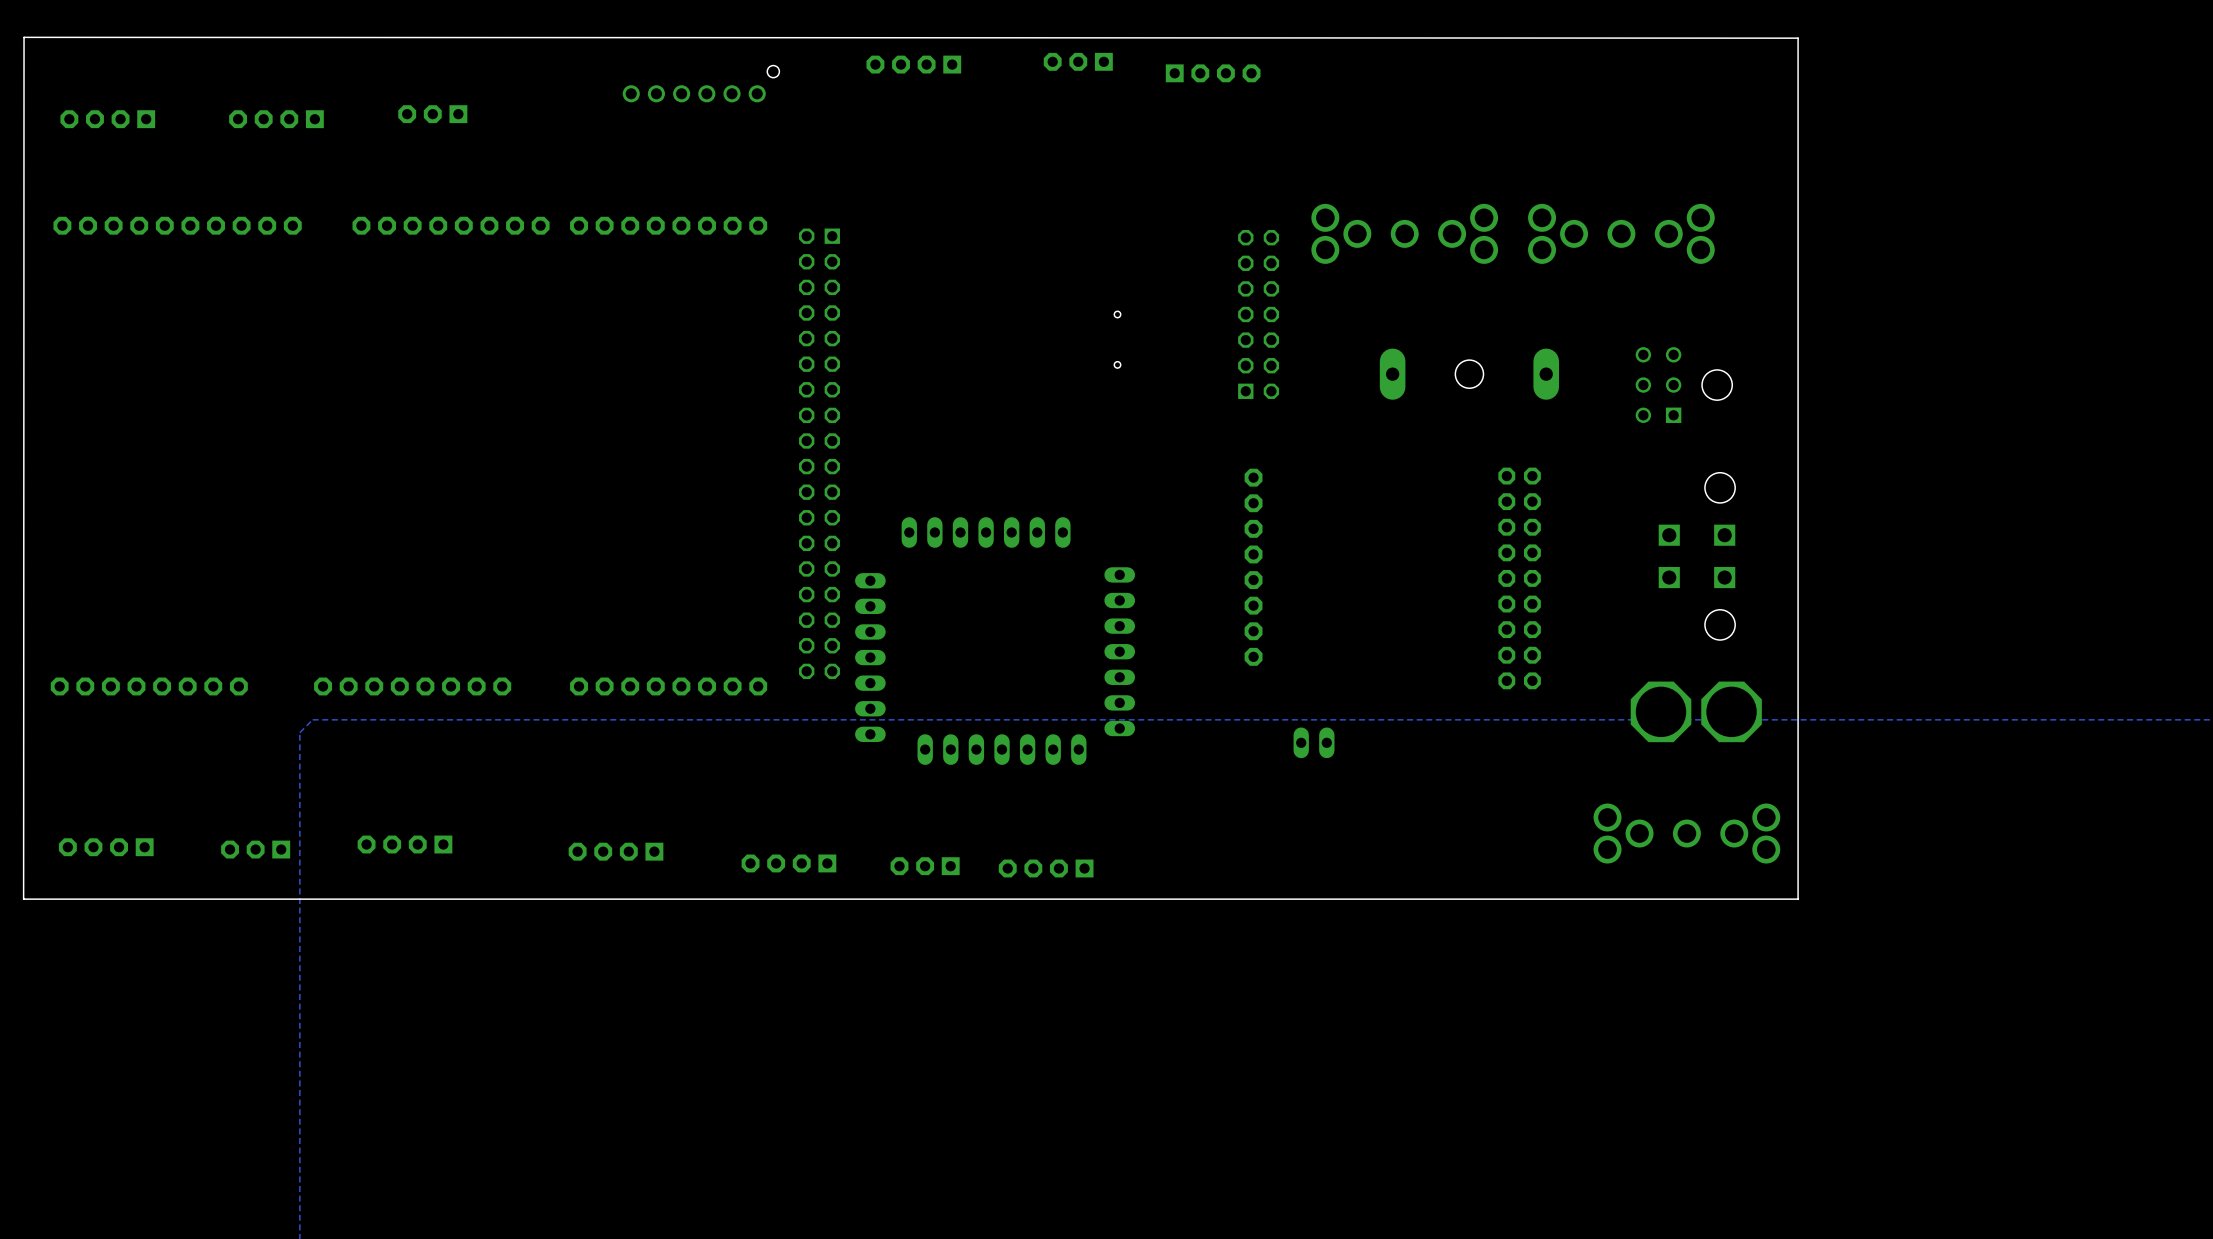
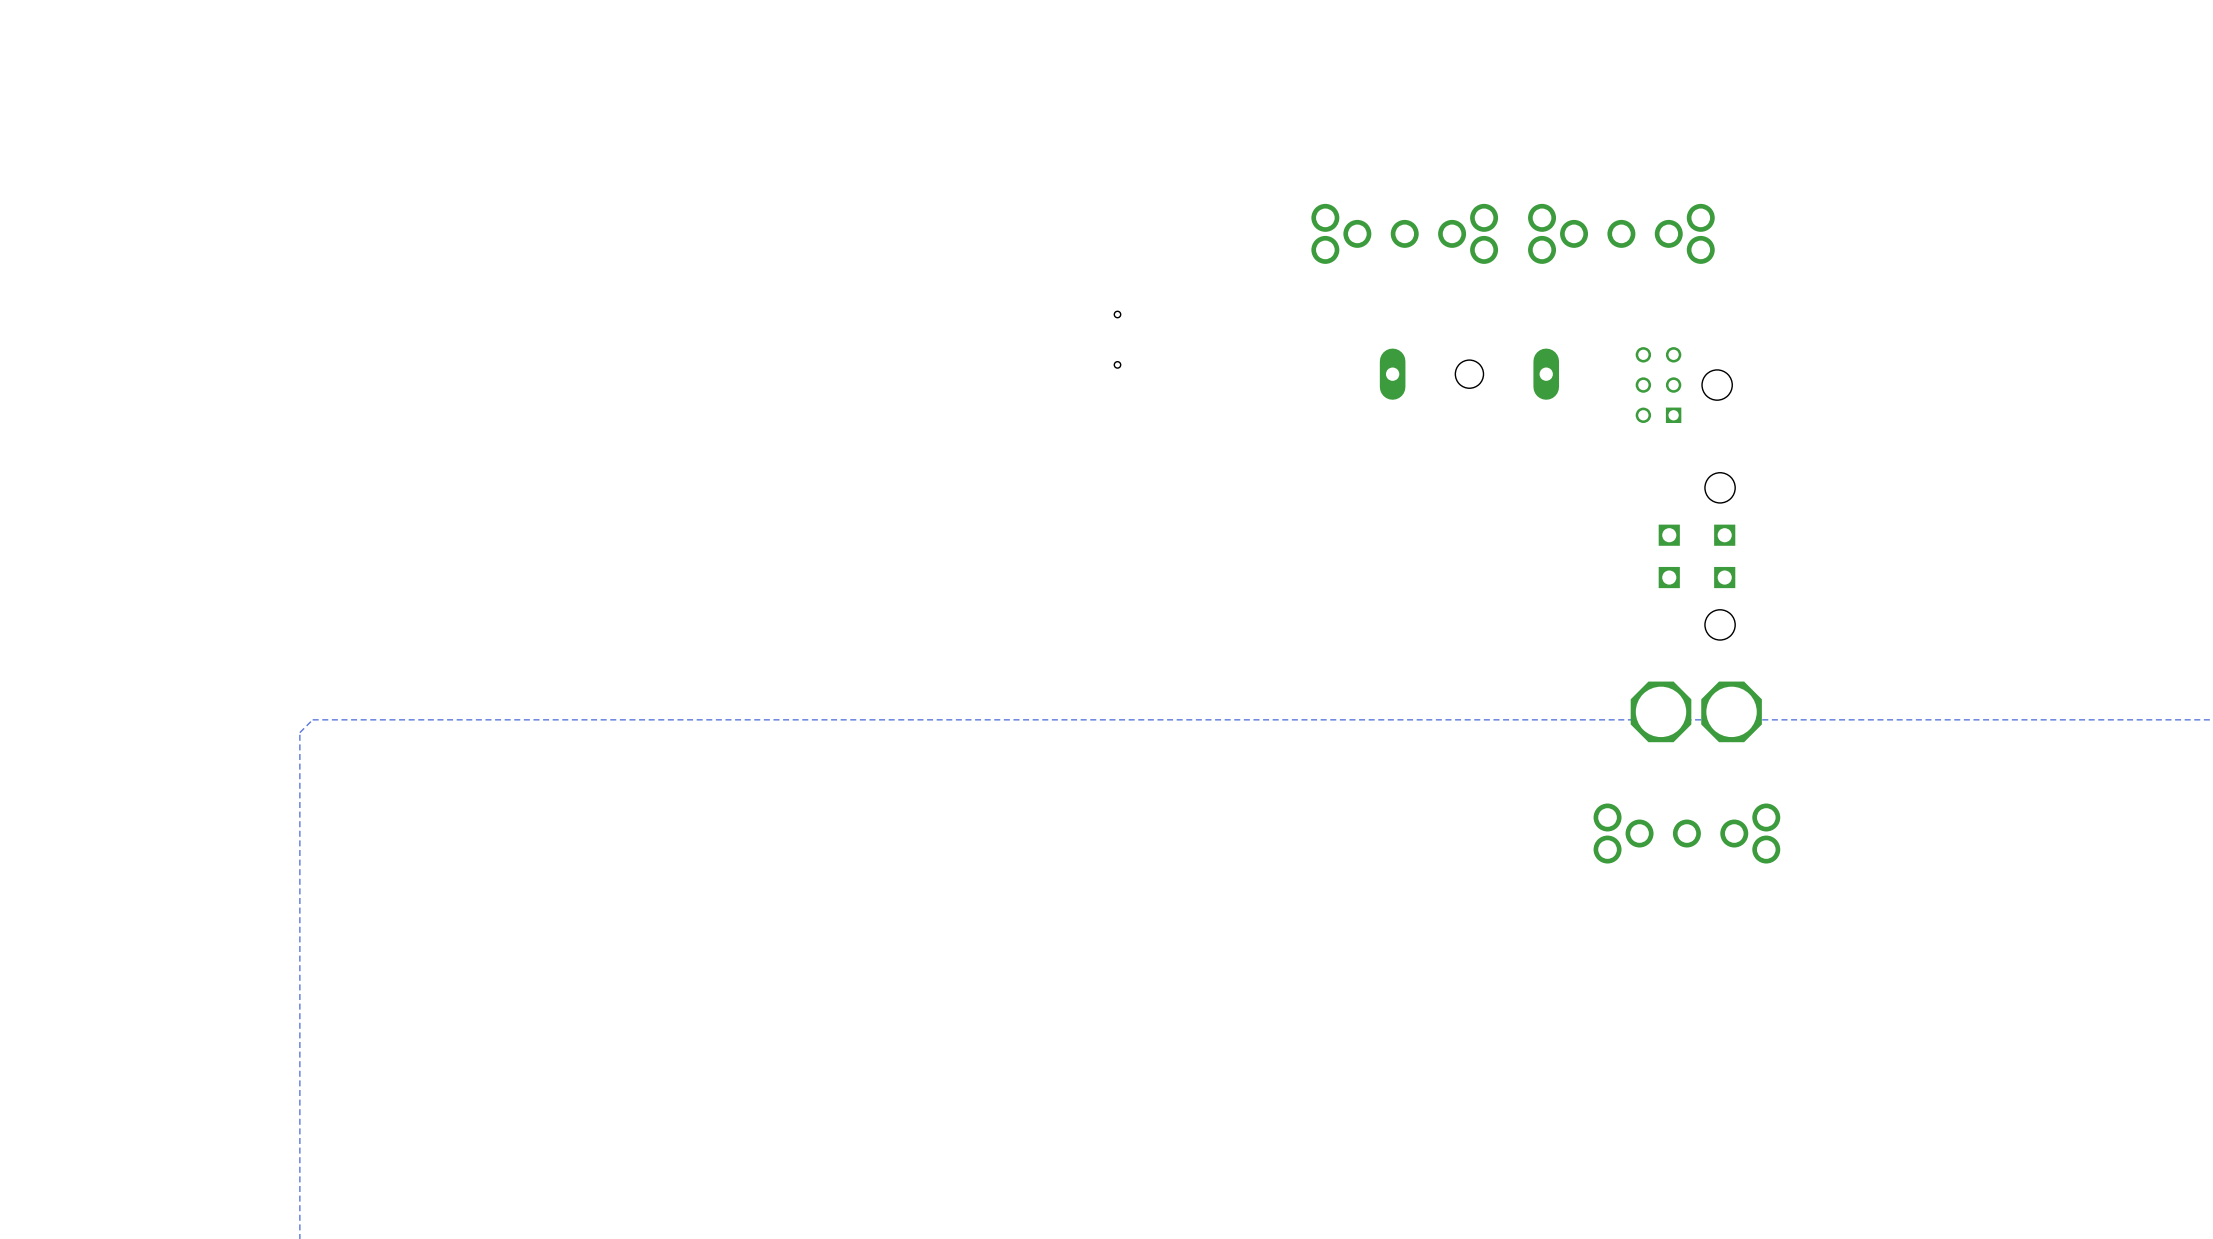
board edge: (24, 37) (1798, 38) (1798, 899) (23, 899) (24, 37) -> none
part: (1078, 61) -> none
part: (913, 64) -> none
part: (1213, 73) -> none
part: (701, 83) -> none
part: (432, 114) -> none
part: (107, 119) -> none
part: (276, 119) -> none
part: (177, 225) -> none
part: (451, 225) -> none
part: (668, 225) -> none
part: (1258, 314) -> none
part: (819, 453) -> none
part: (986, 532) -> none
part: (1253, 567) -> none
part: (1519, 578) -> none
part: (1119, 651) -> none
part: (870, 657) -> none
part: (149, 686) -> none
part: (412, 686) -> none
part: (668, 686) -> none
part: (1314, 742) -> none
part: (1002, 749) -> none
part: (404, 844) -> none
part: (106, 847) -> none
part: (255, 849) -> none
part: (616, 851) -> none
part: (788, 863) -> none
part: (925, 866) -> none
part: (1046, 868) -> none

